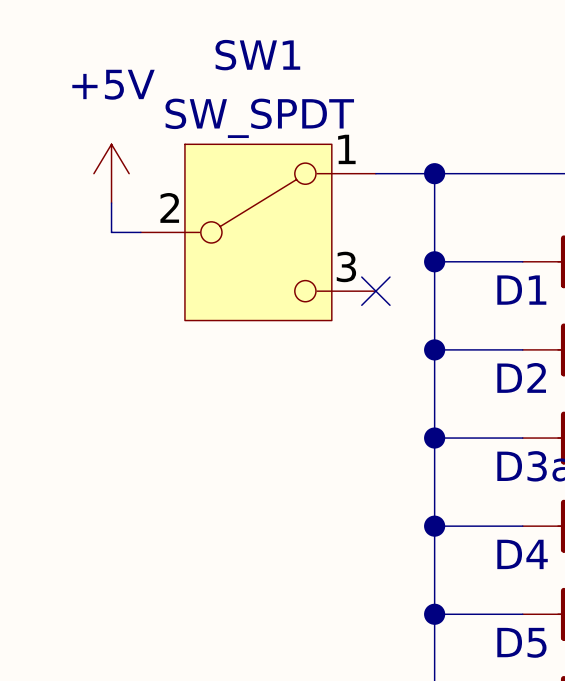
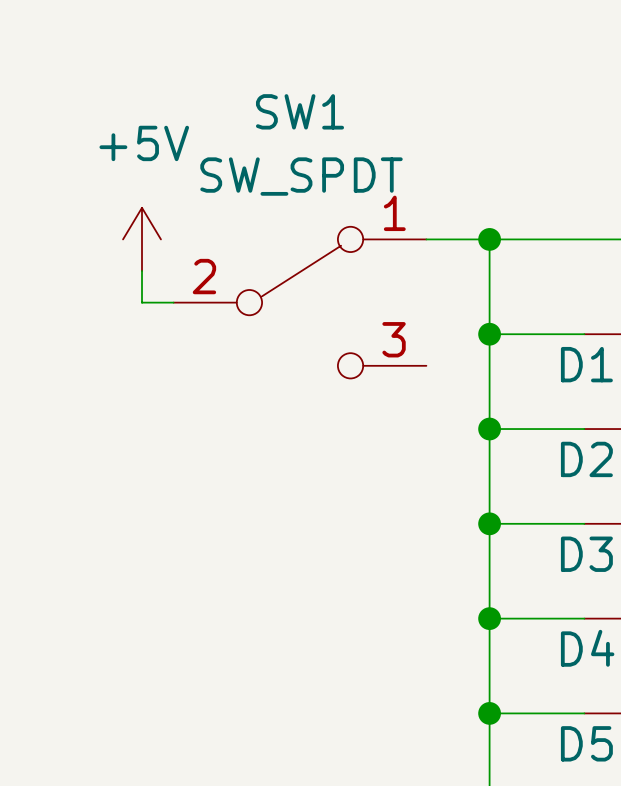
SW1 symbol: [140, 144, 376, 321] -> [173, 226, 427, 379]
no-connect mark: (375, 291) -> none

